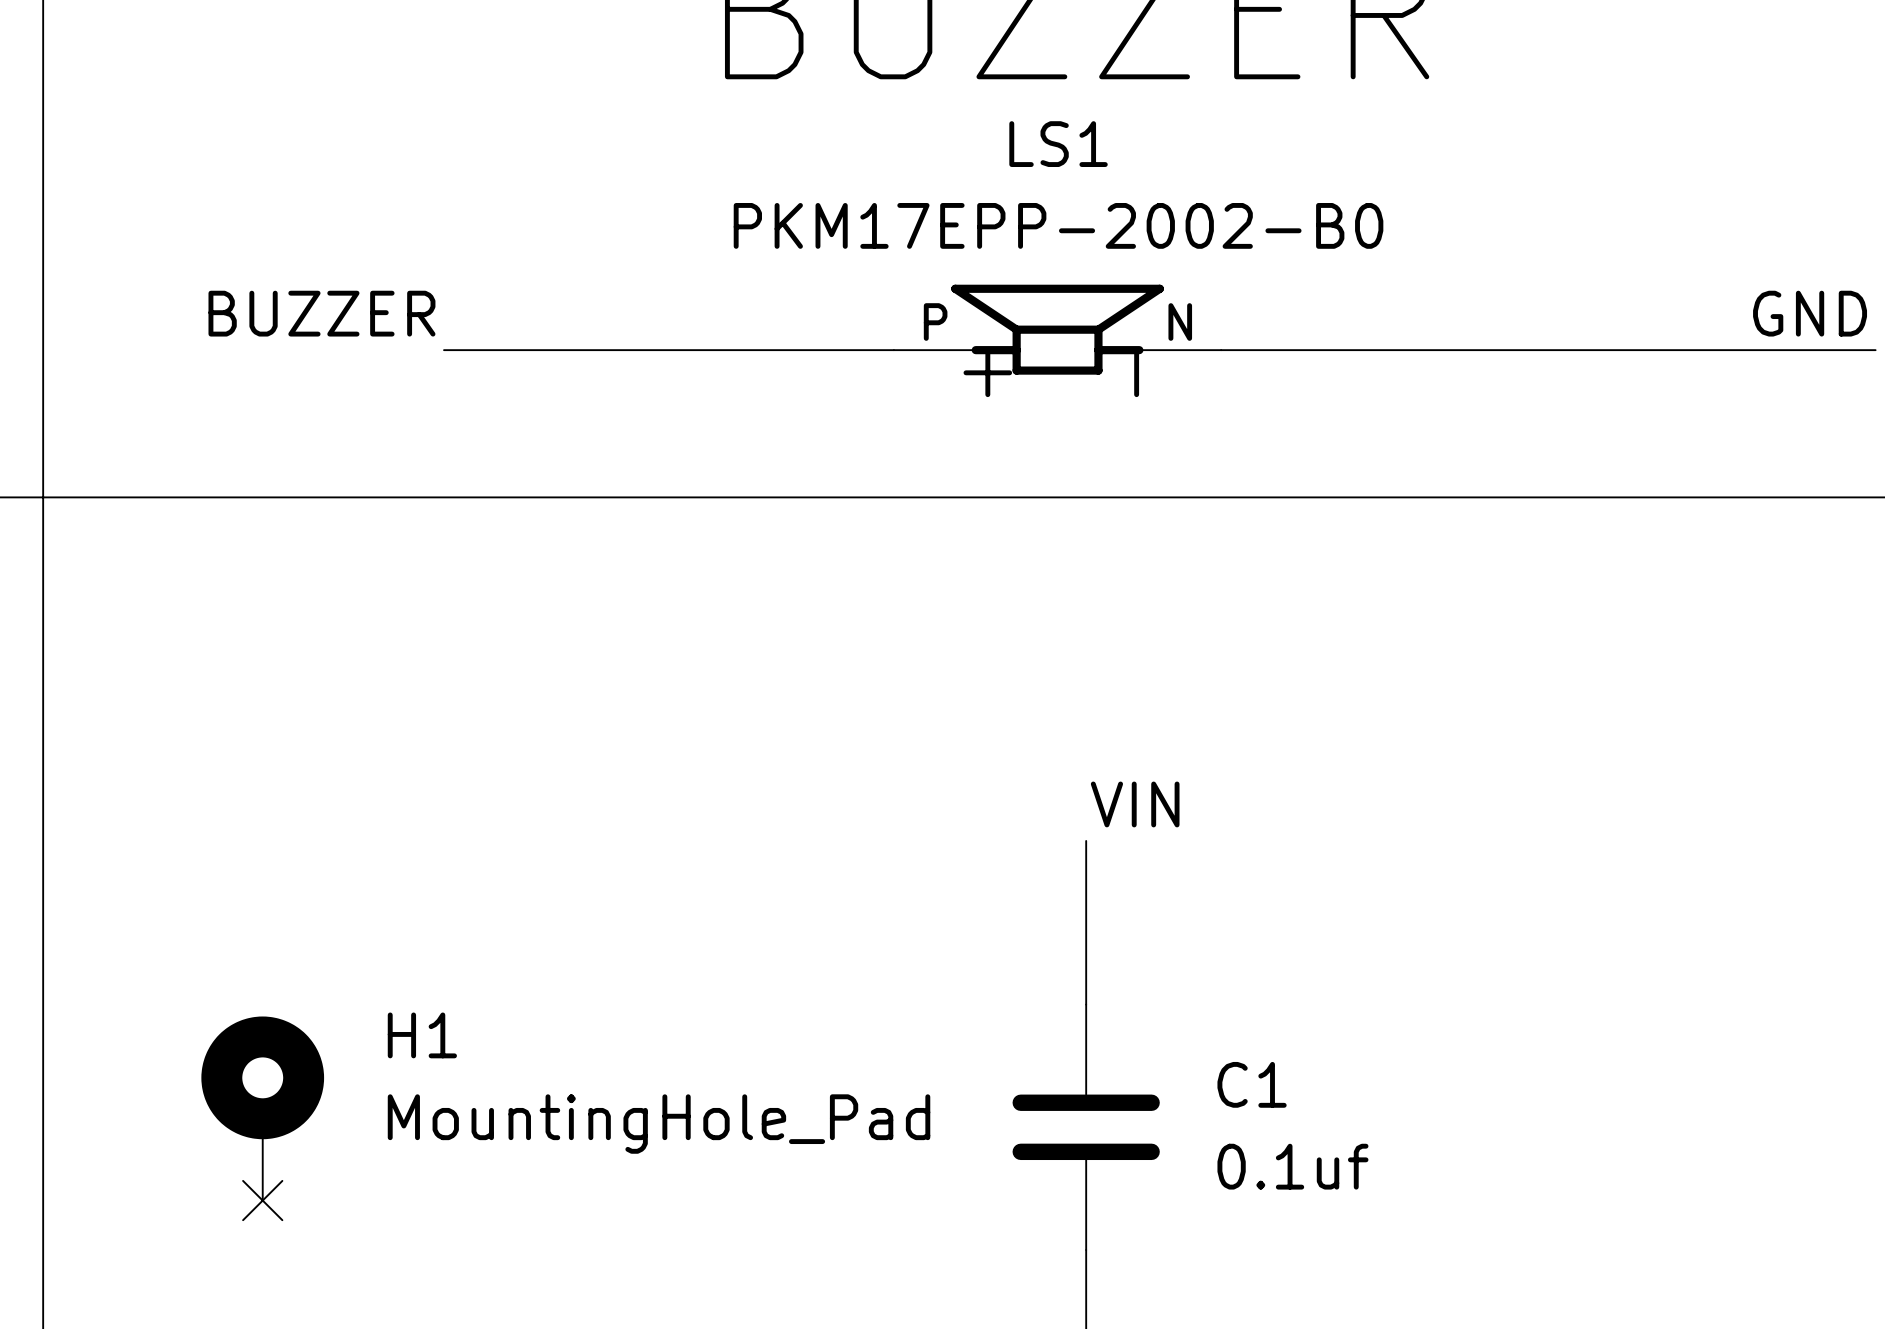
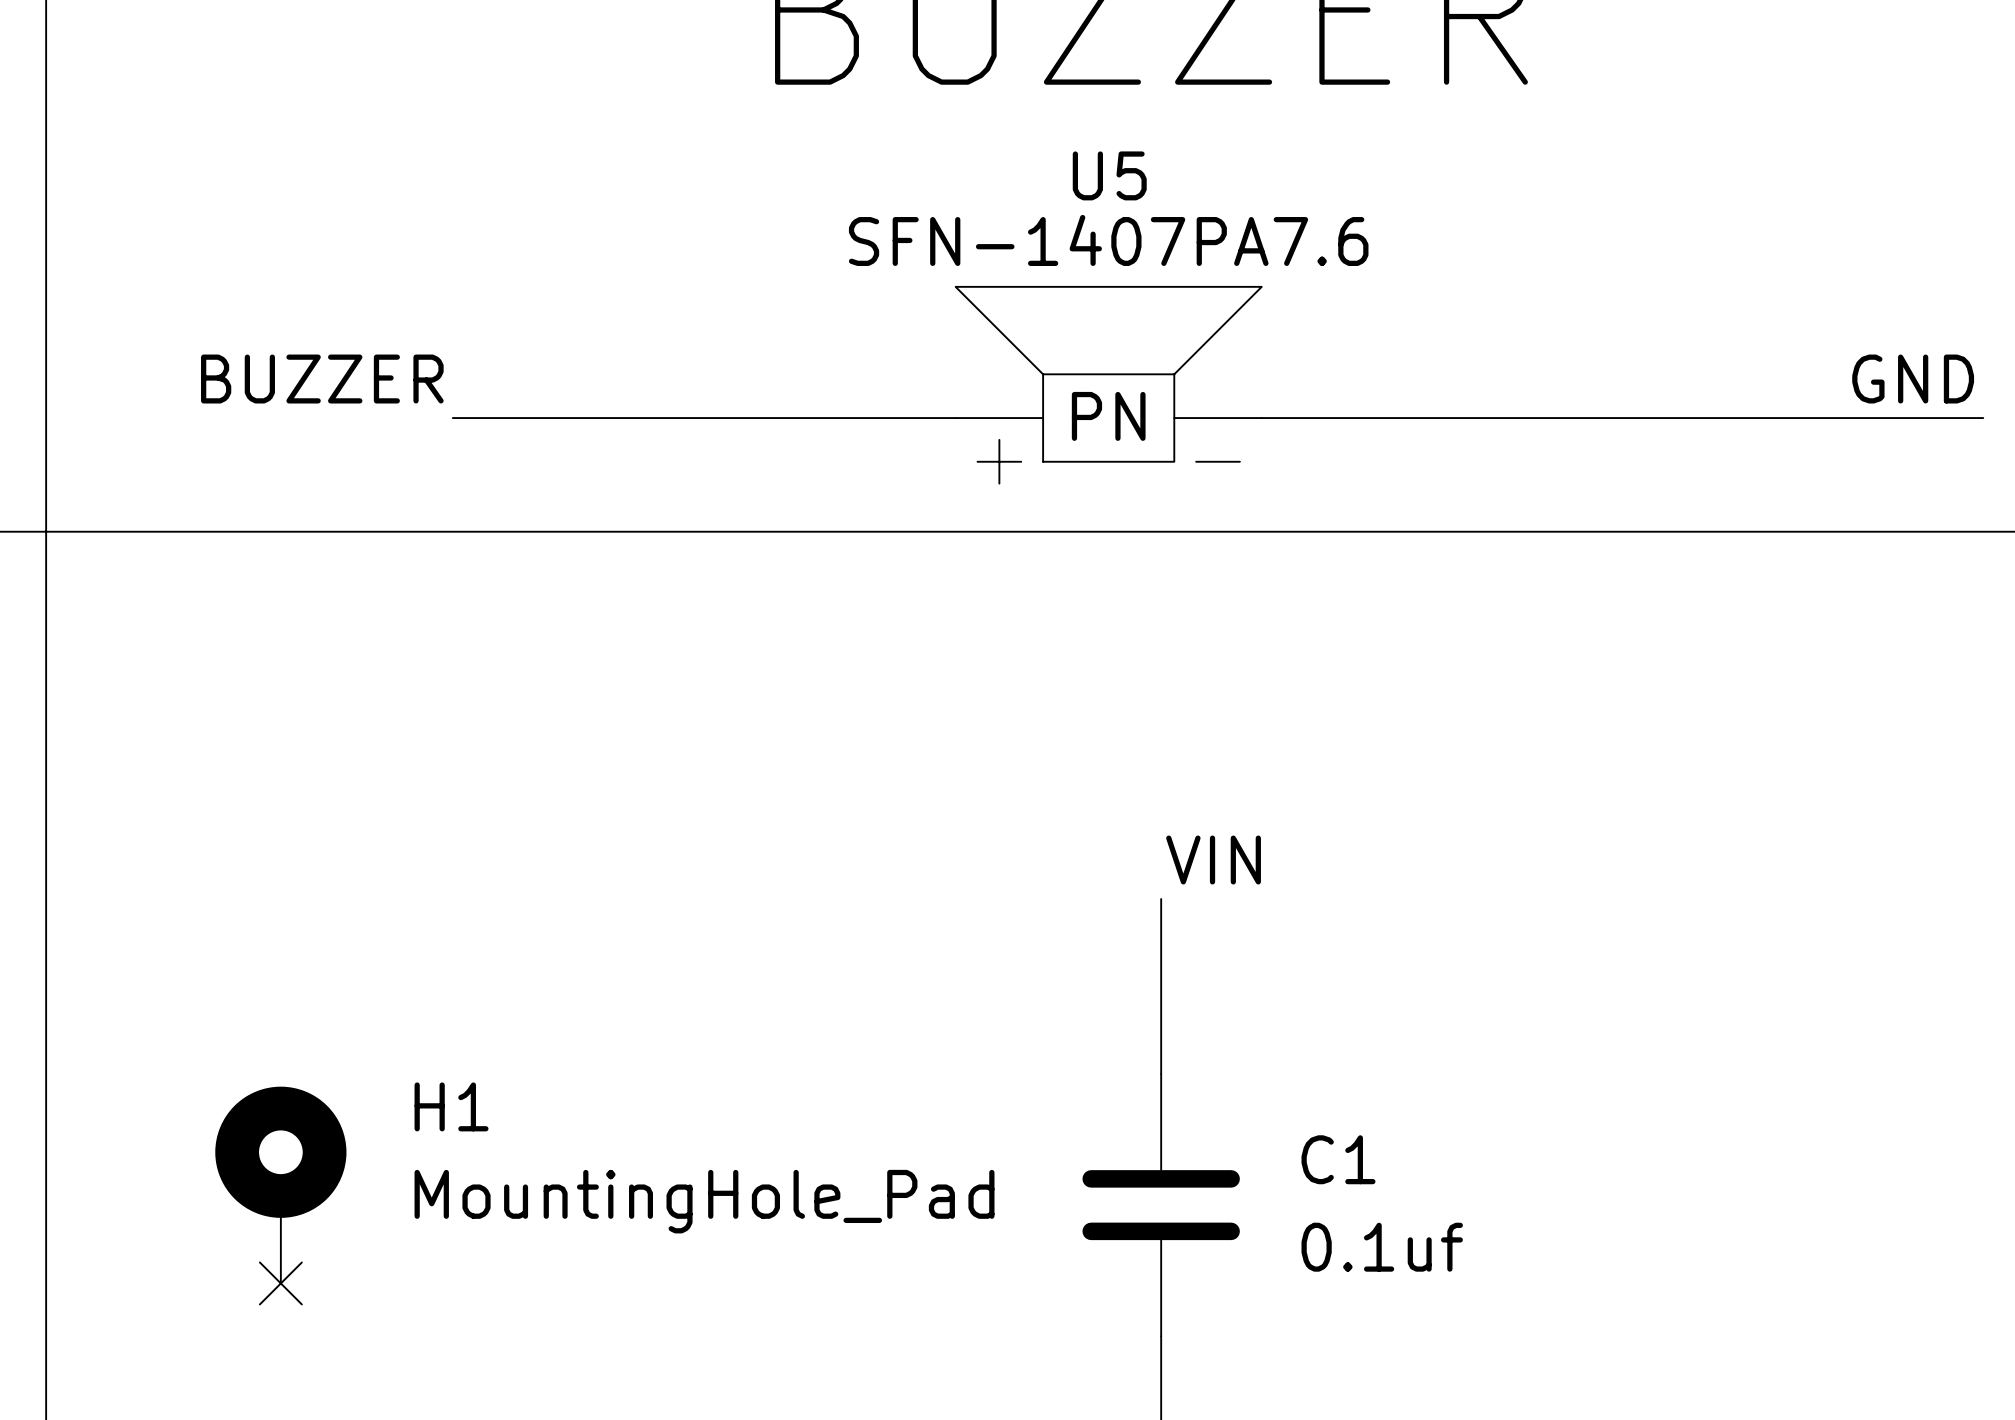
label position: BUZZER (321, 313) -> BUZZER (322, 379)
label position: GND (1810, 313) -> GND (1913, 379)
LS1: PKM17EPP-2002-B0 (1057, 329) -> none
wire: (444, 350) (893, 350) -> none
wire: (1221, 350) (1875, 350) -> none
U5: none -> SFN-1407PA7.6 (1108, 385)
wire: none -> (452, 418) (955, 418)
wire: none -> (1261, 418) (1983, 418)

